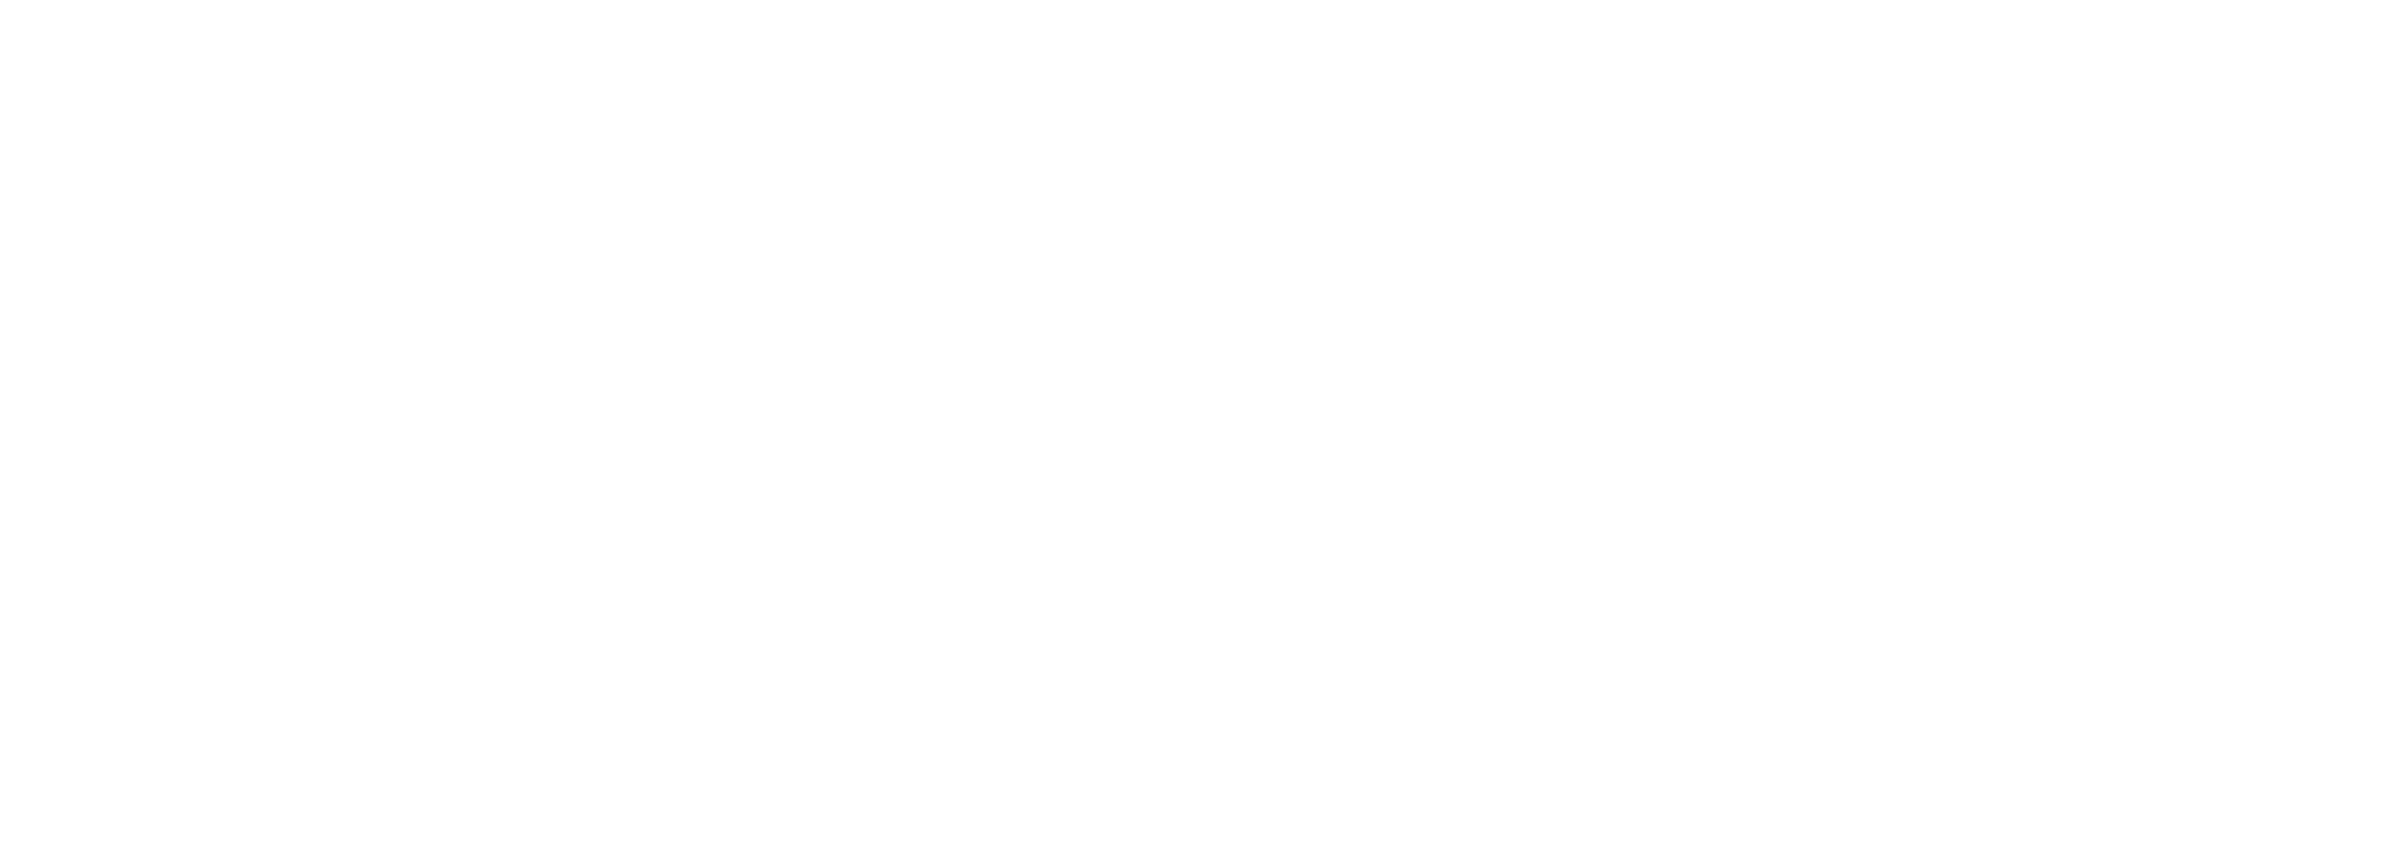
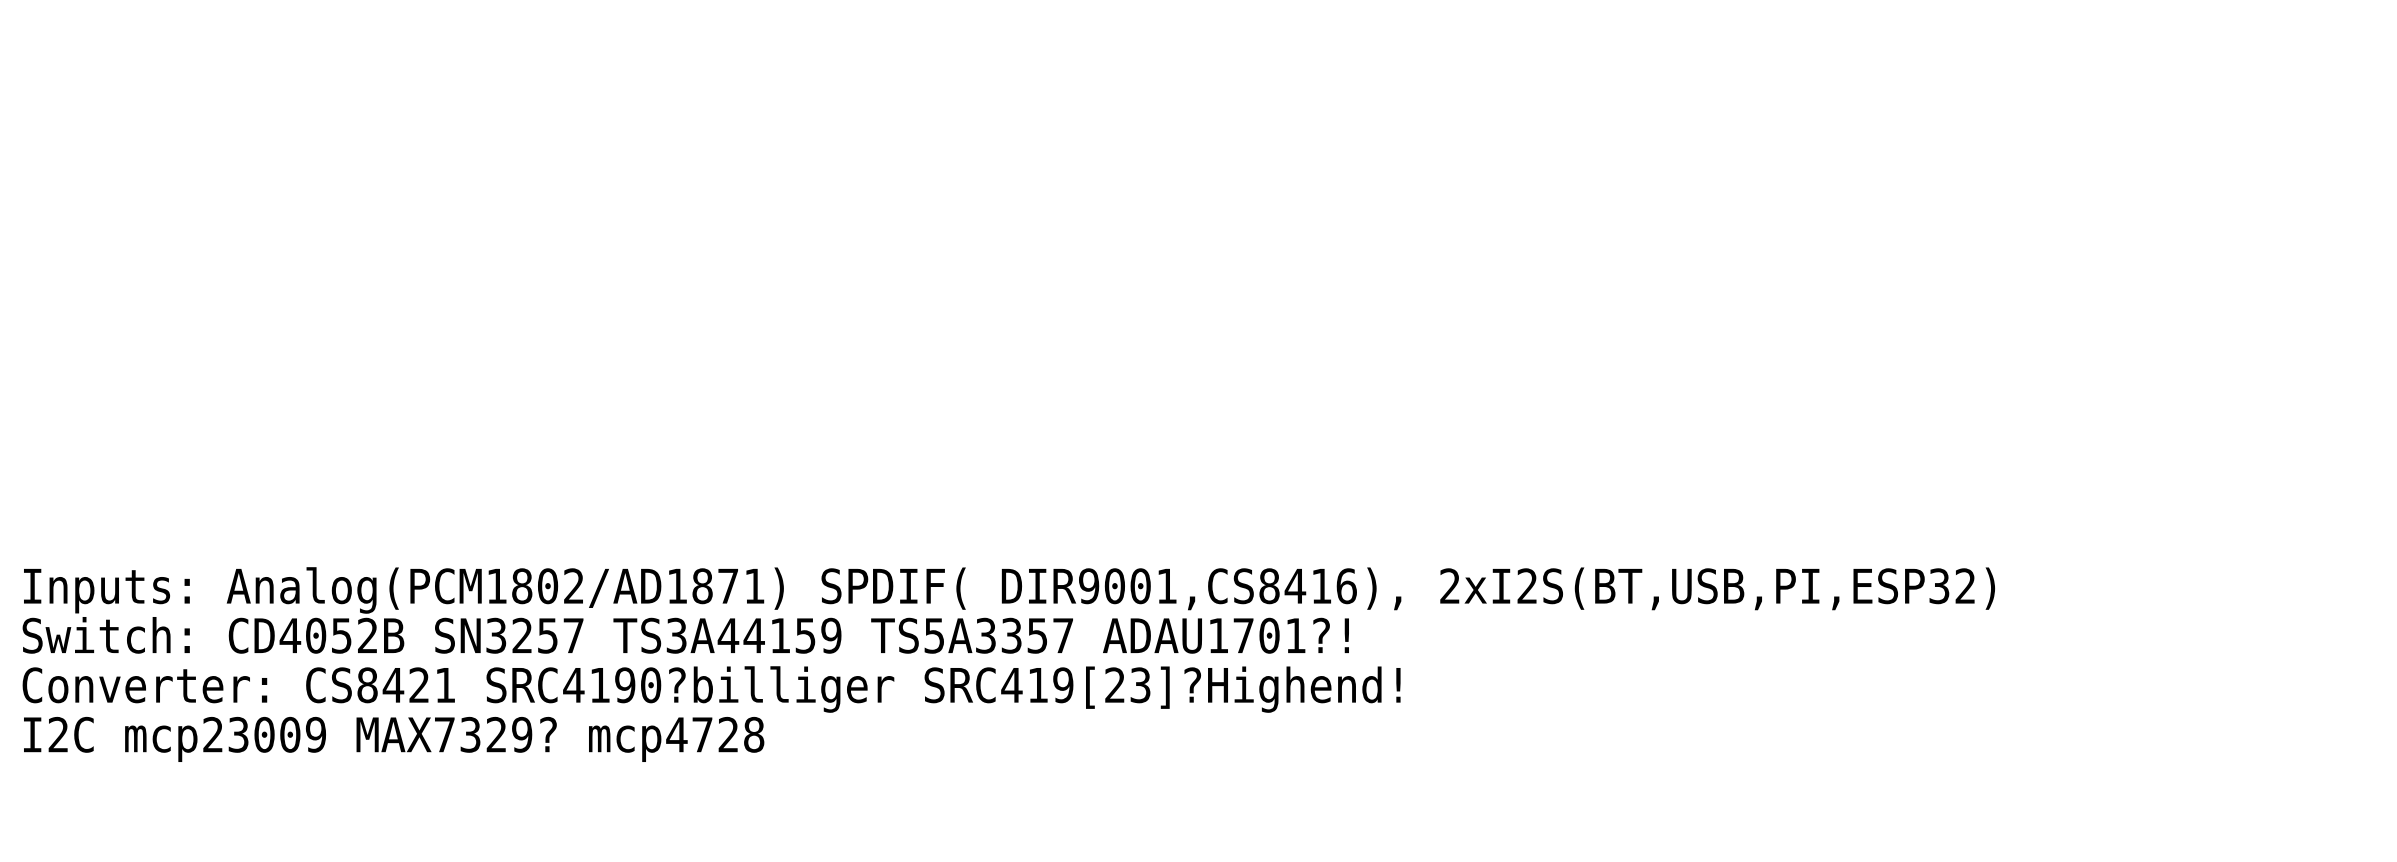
text: none -> Inputs: Analog(PCM1802/AD1871) SPDIF( DIR9001,CS8416), 2xI2S(BT,USB,PI,ESP32) (1009, 590)
text: none -> Switch: CD4052B SN3257 TS3A44159 TS5A3357 ADAU1701?! (685, 635)
text: none -> Converter: CS8421 SRC4190?billiger SRC419[23]?Highend! (711, 689)
text: none -> I2C mcp23009 MAX7329? mcp4728 (394, 739)

